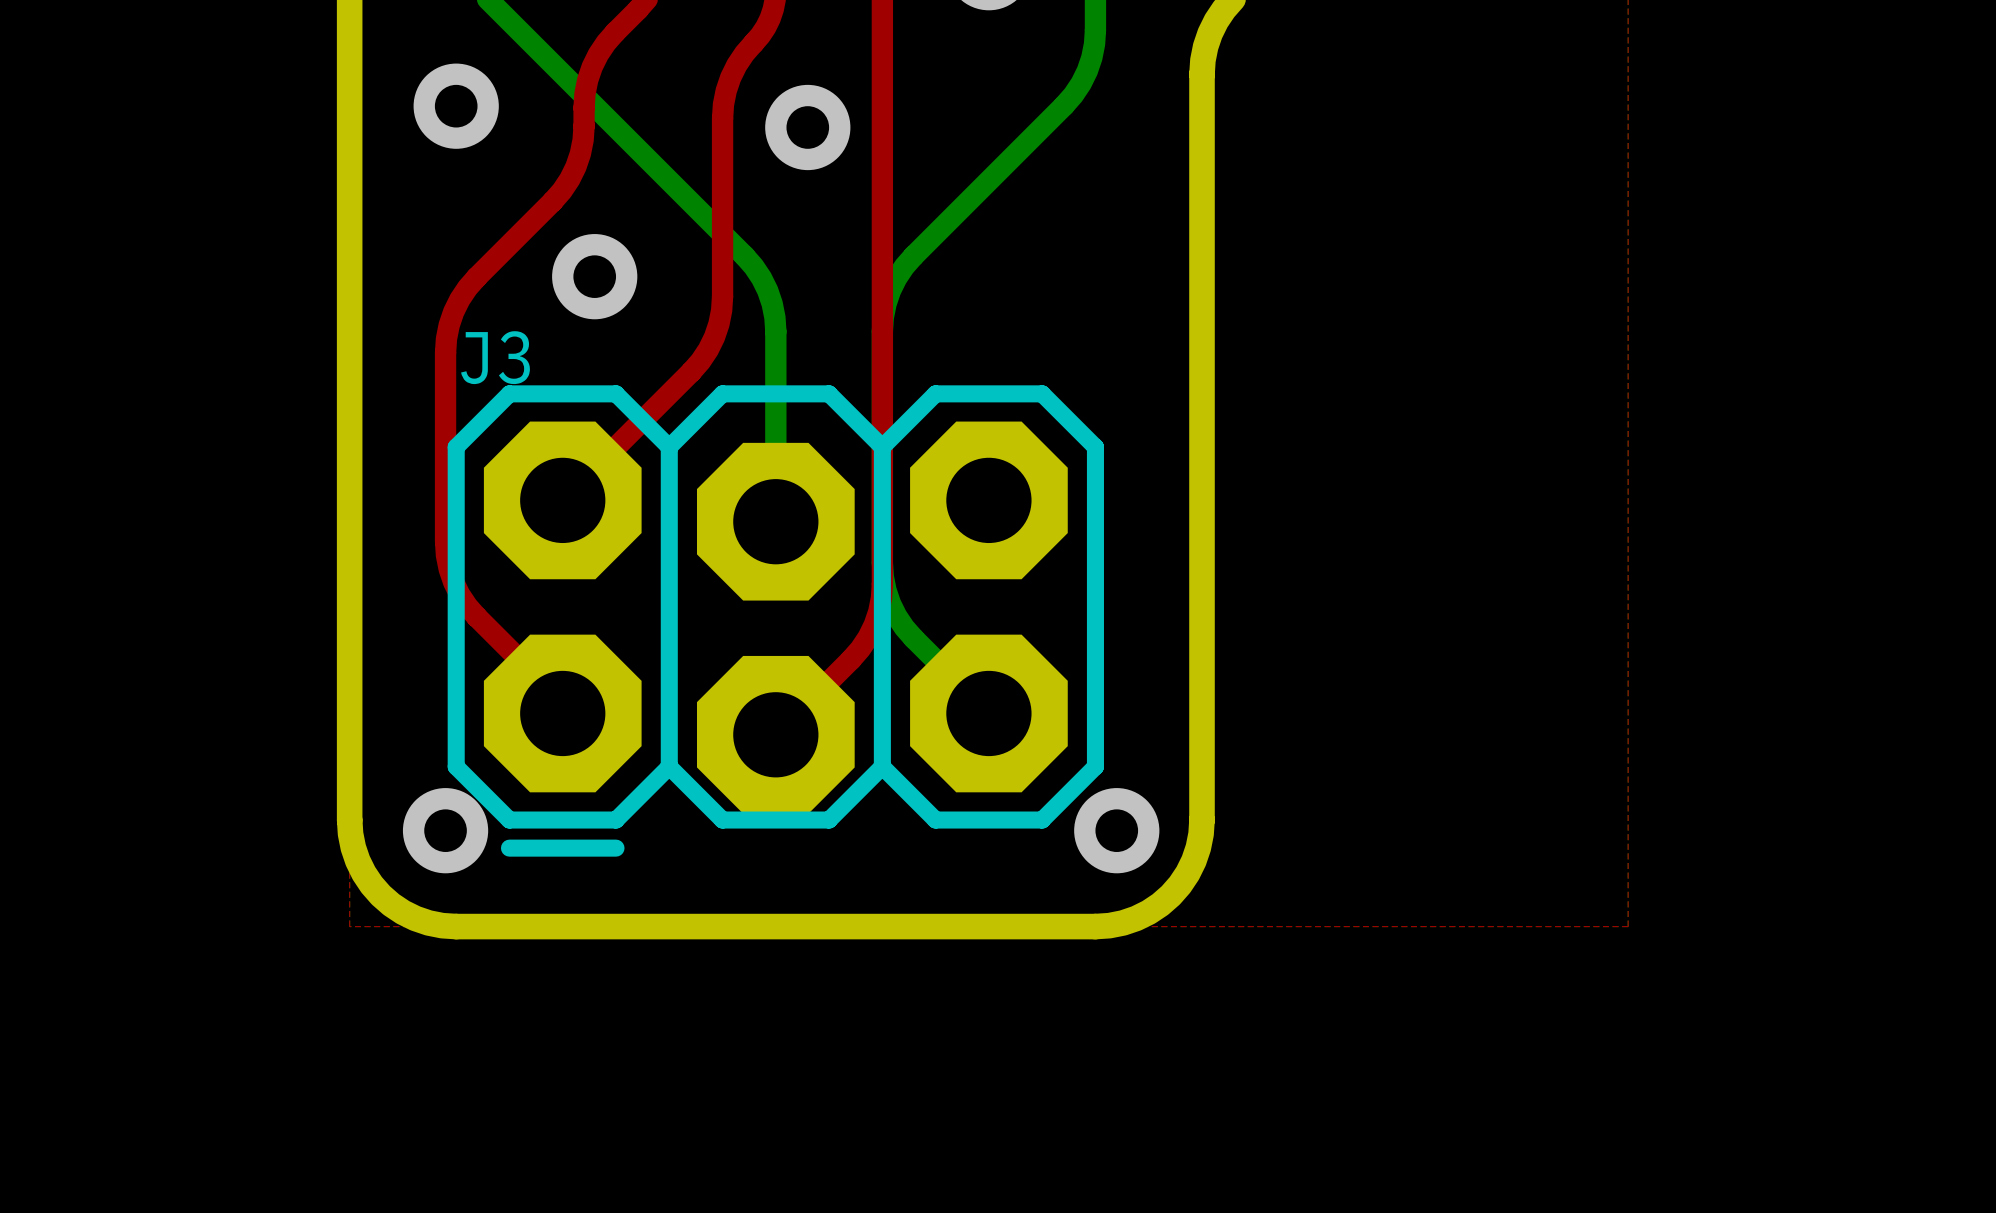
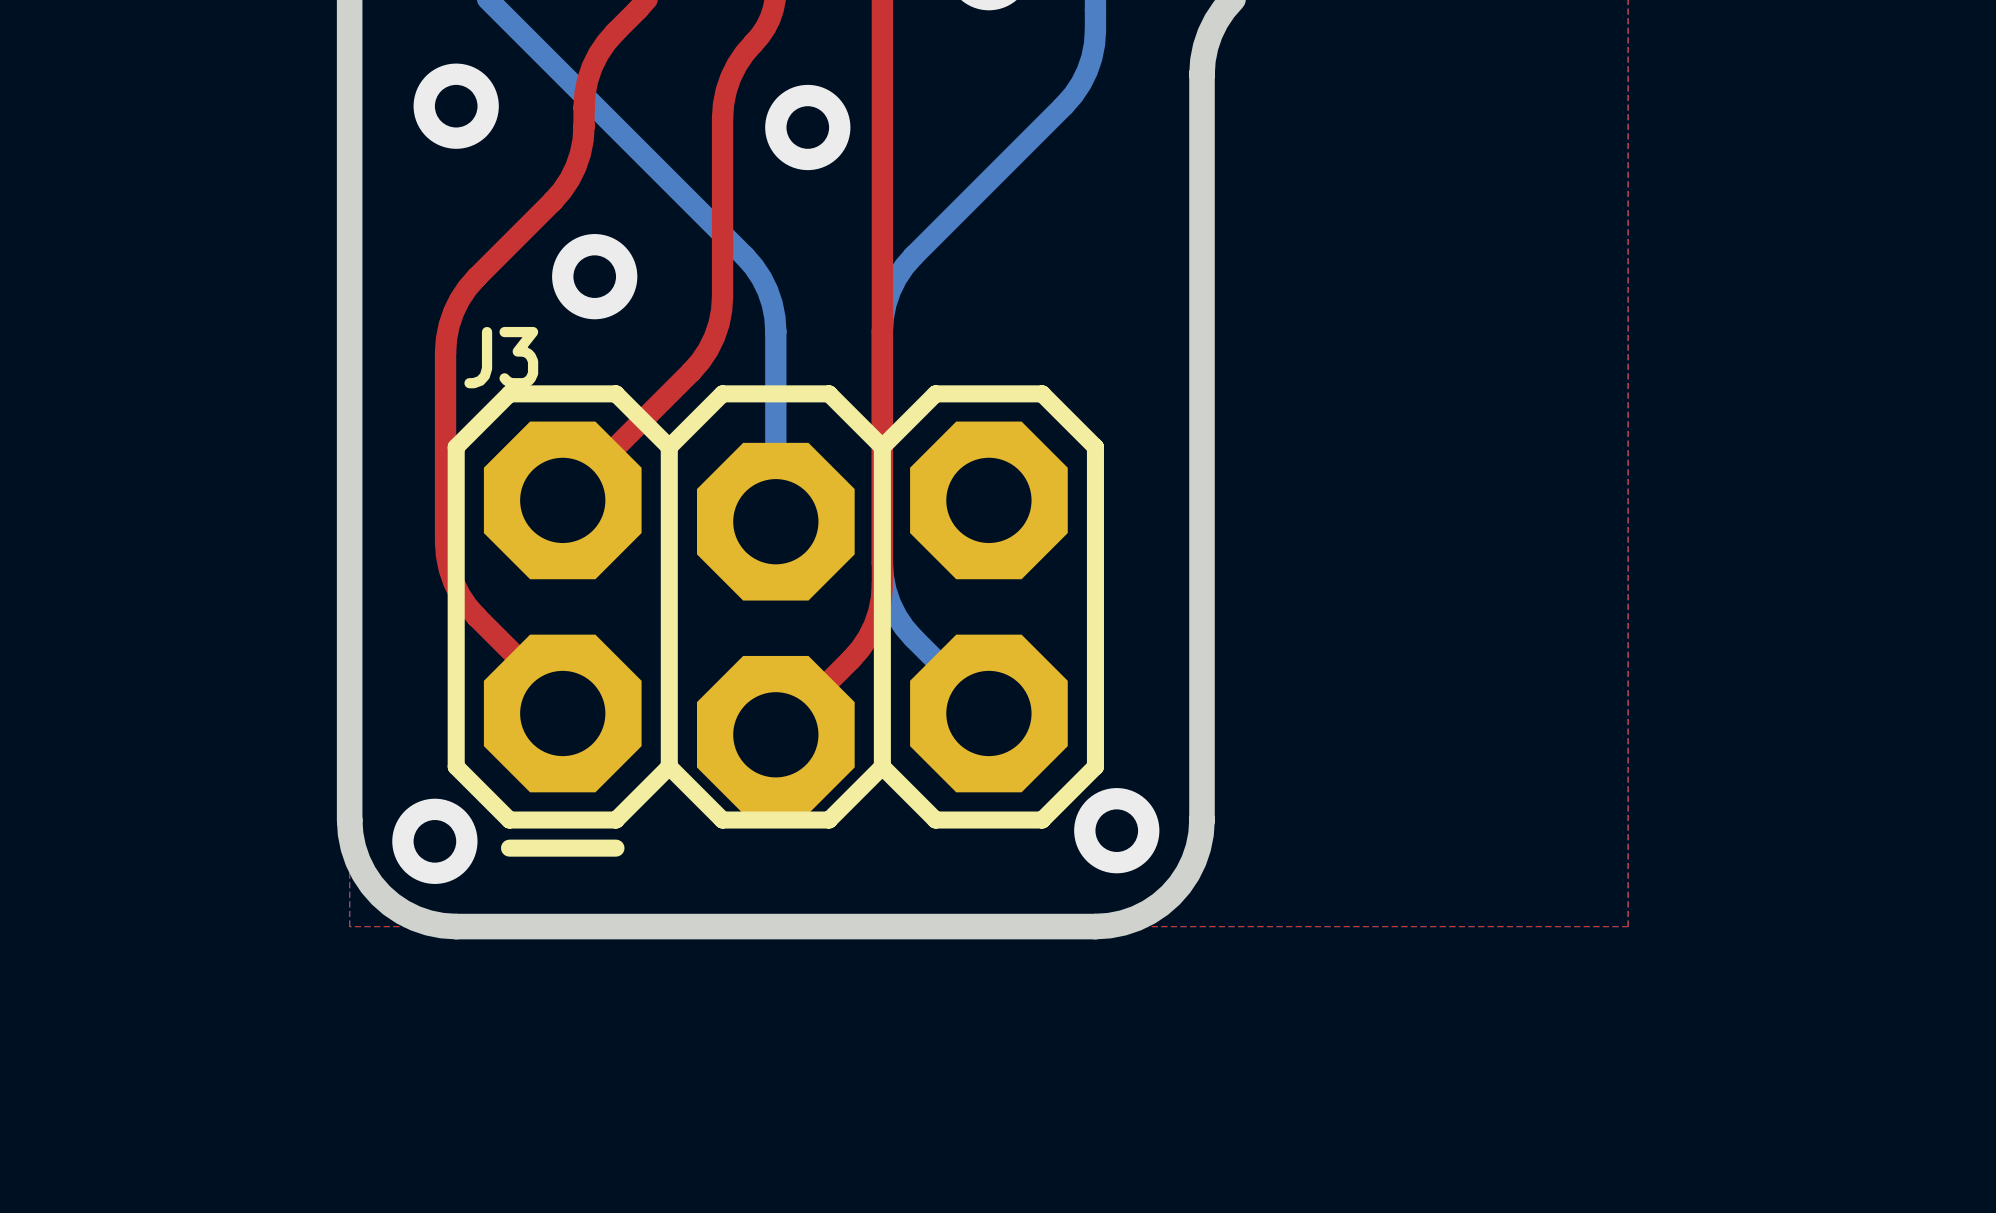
via position: (445, 830) -> (434, 841)

